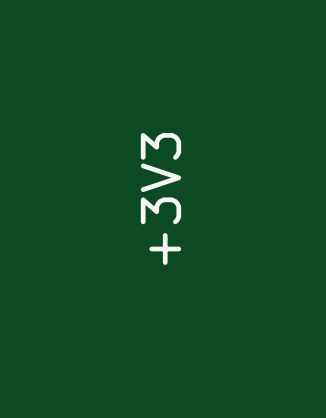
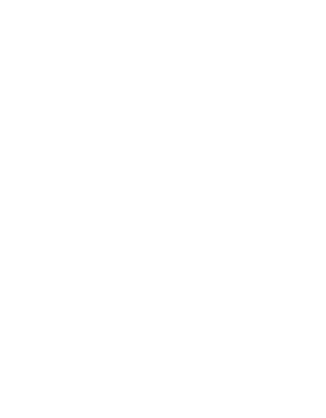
text: +3V3 (161, 198) -> none

